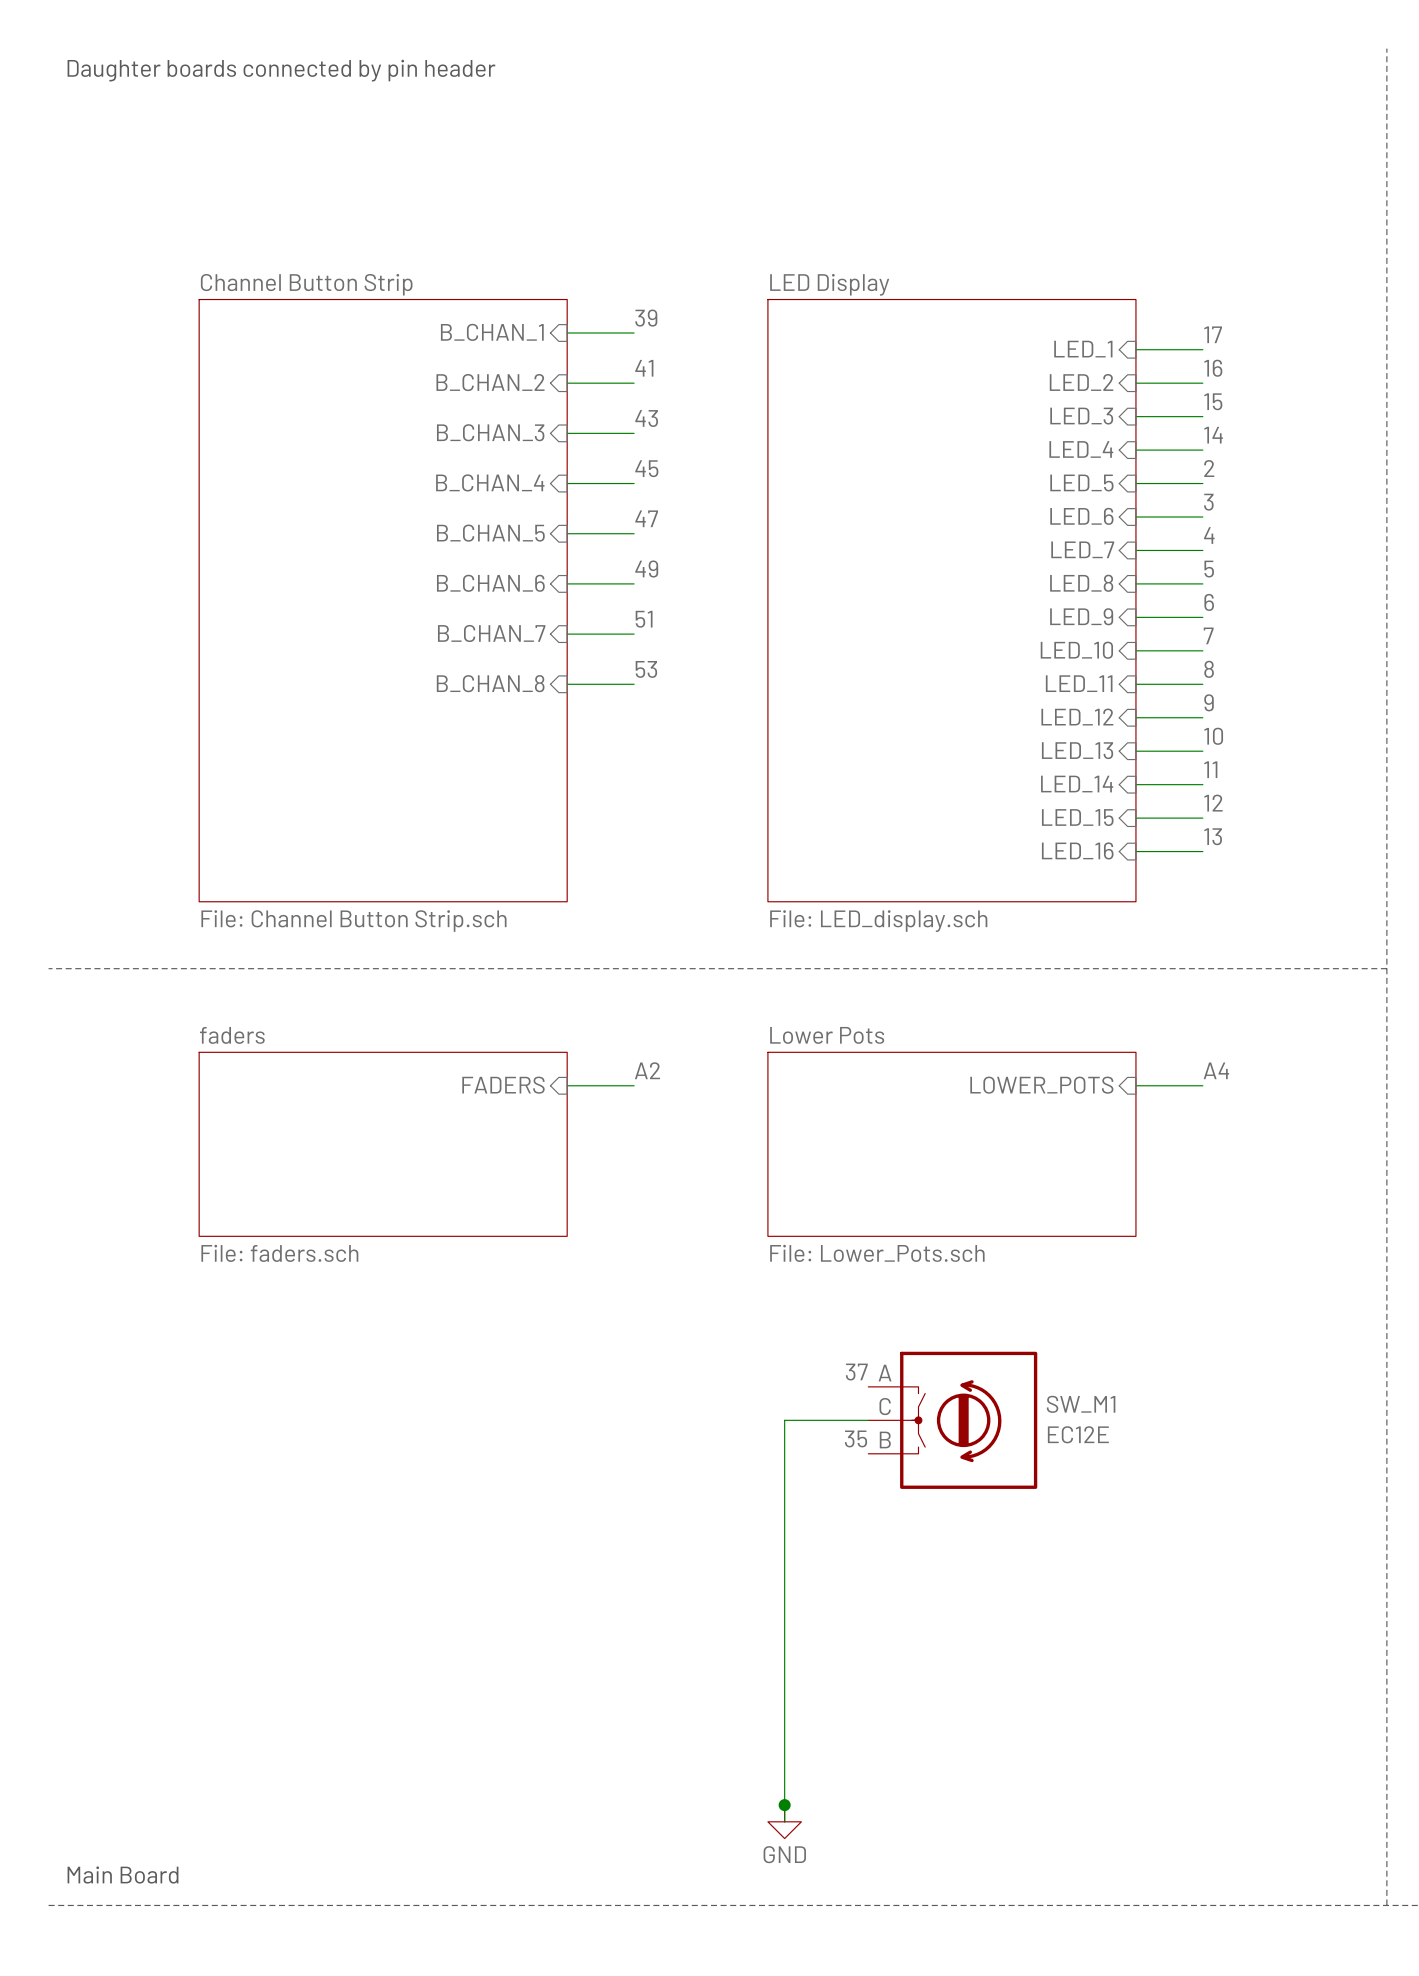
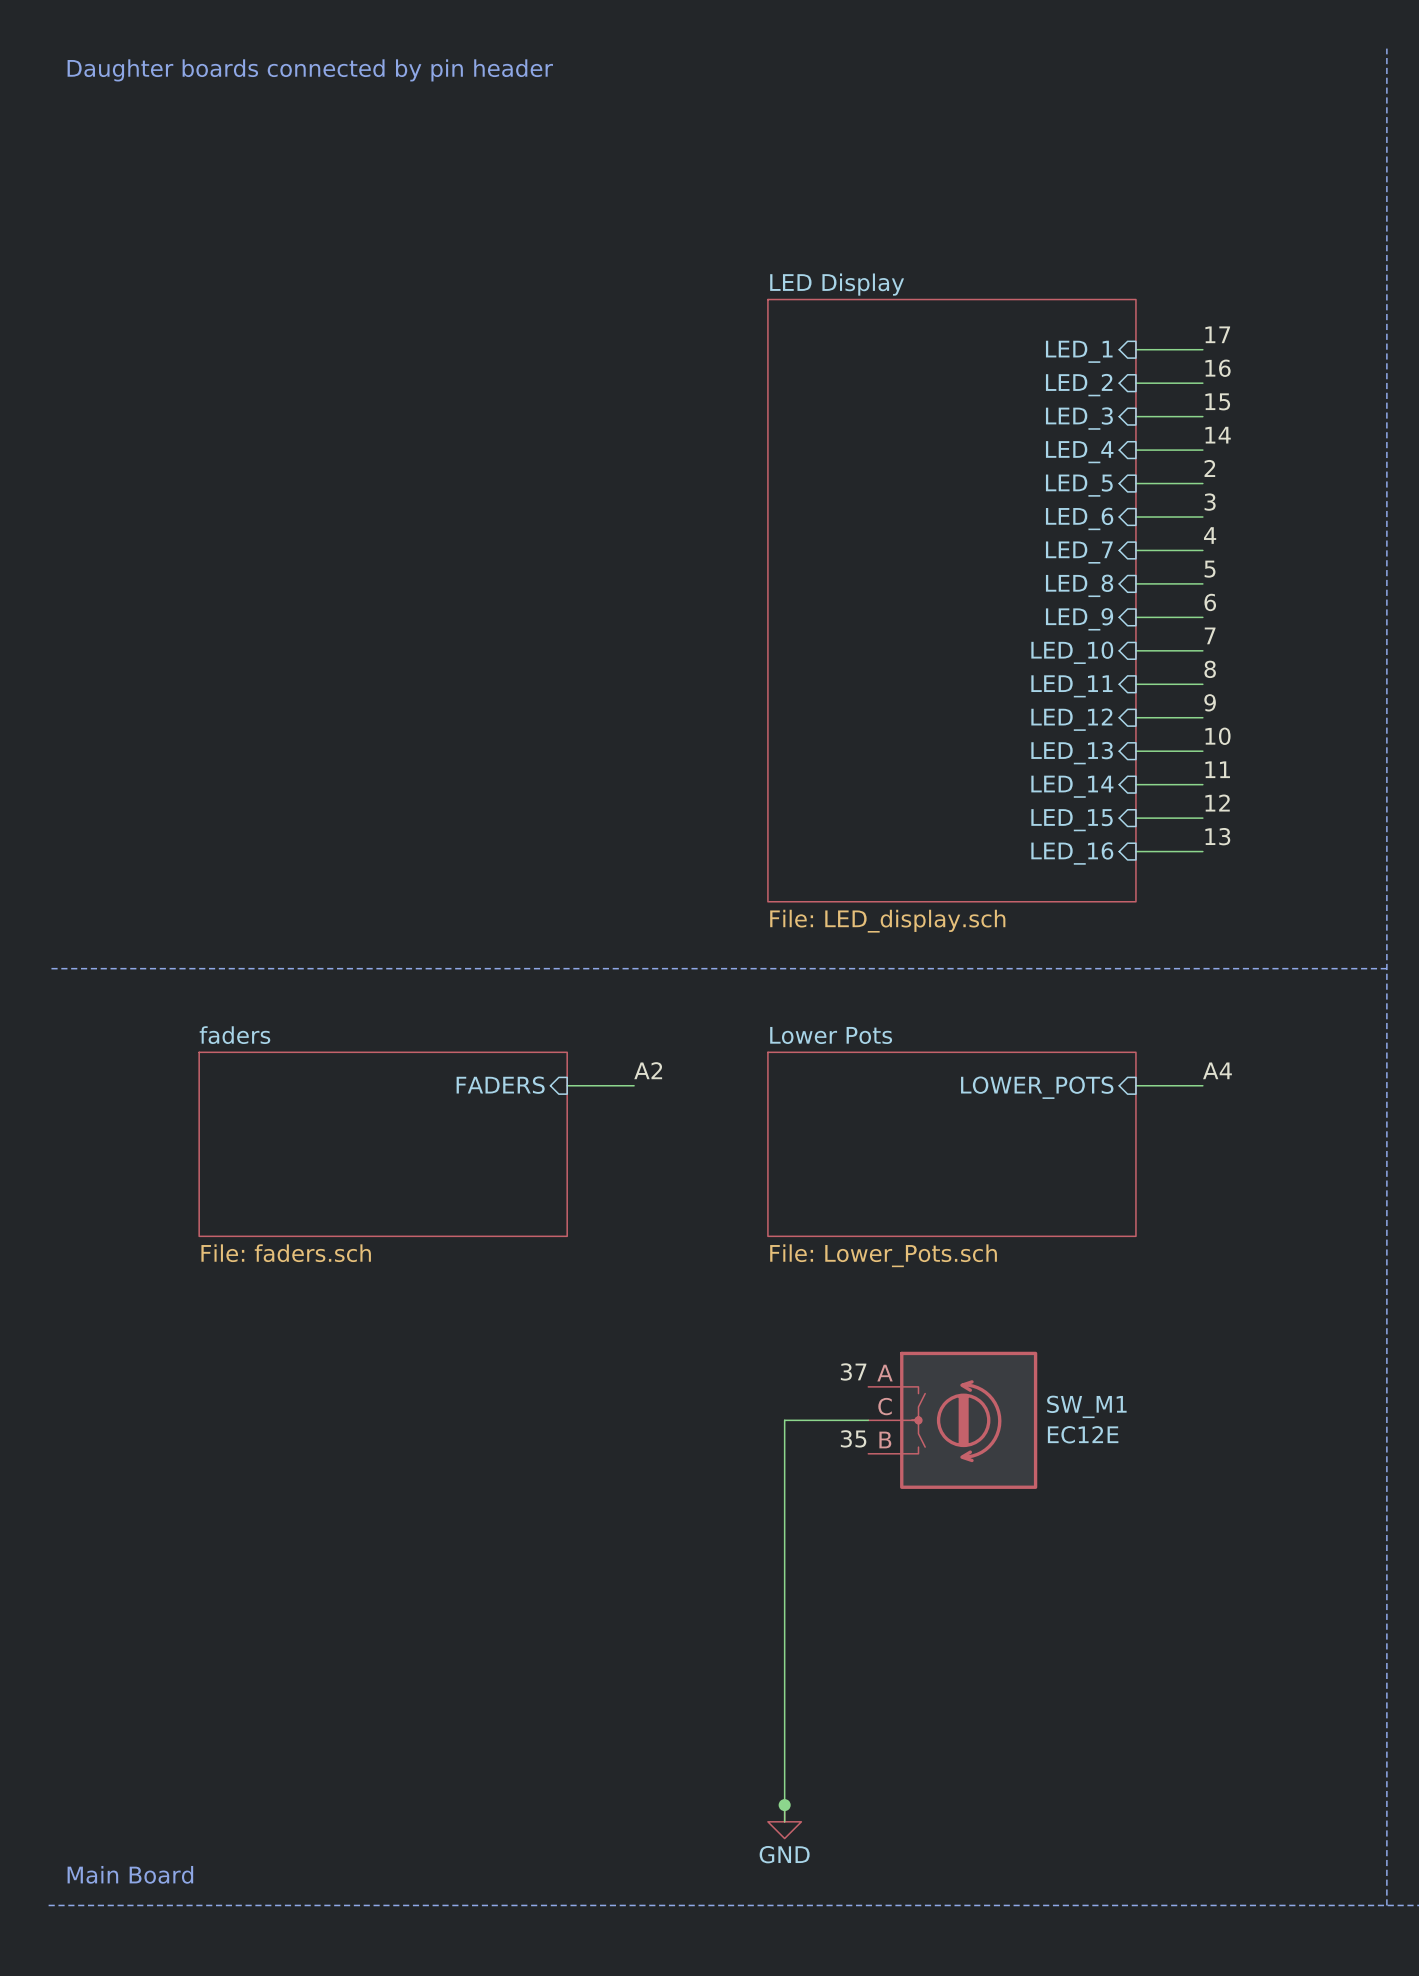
label: 39 (646, 318) -> none
sheet pin: B_CHAN_1 (492, 332) -> none
wire: (567, 332) (634, 332) -> none
label: 41 (644, 368) -> none
sheet pin: B_CHAN_2 (490, 382) -> none
wire: (567, 383) (634, 383) -> none
label: 43 (646, 418) -> none
sheet pin: B_CHAN_3 (490, 432) -> none
wire: (567, 433) (634, 433) -> none
label: 45 (646, 468) -> none
sheet pin: B_CHAN_4 (490, 482) -> none
wire: (567, 483) (634, 483) -> none
label: 47 (646, 518) -> none
sheet pin: B_CHAN_5 (490, 533) -> none
wire: (567, 533) (634, 533) -> none
label: 49 (646, 569) -> none
sheet pin: B_CHAN_6 (490, 583) -> none
wire: (567, 583) (634, 583) -> none
sheet Channel Button Strip: File: Channel Button Strip.sch (383, 600) -> none
label: 51 (644, 619) -> none
sheet pin: B_CHAN_7 (491, 633) -> none
wire: (567, 634) (634, 634) -> none
label: 53 (646, 669) -> none
sheet pin: B_CHAN_8 (490, 683) -> none
wire: (567, 684) (634, 684) -> none

